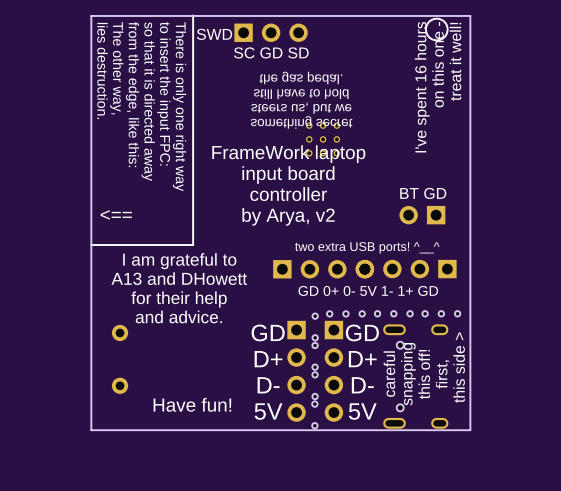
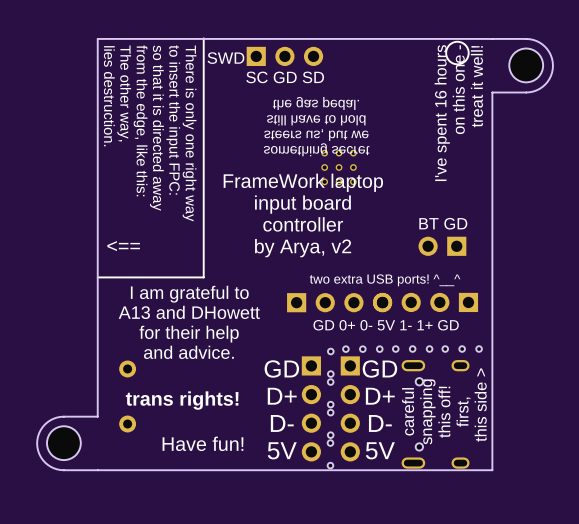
board edge: (470, 15) (470, 67) -> (492, 38) (526, 38) (536, 40) (547, 49) (552, 65) (547, 82) (536, 90) (526, 92) (492, 92)
part: none -> (526, 65)
text: none -> trans rights! (182, 400)
board edge: (91, 378) (91, 430) -> (97, 416) (63, 416) (53, 418) (42, 427) (37, 443) (42, 459) (53, 468) (63, 470) (97, 470)
part: none -> (63, 443)

